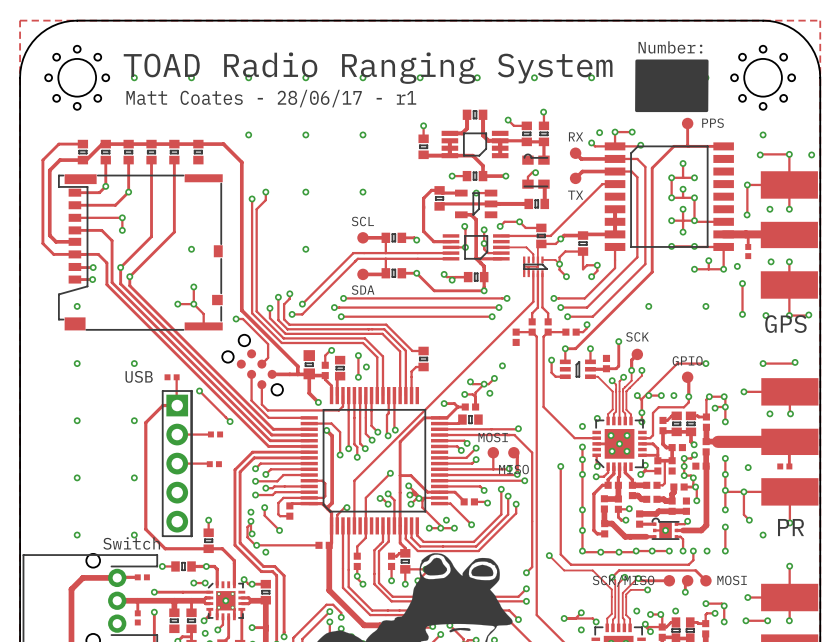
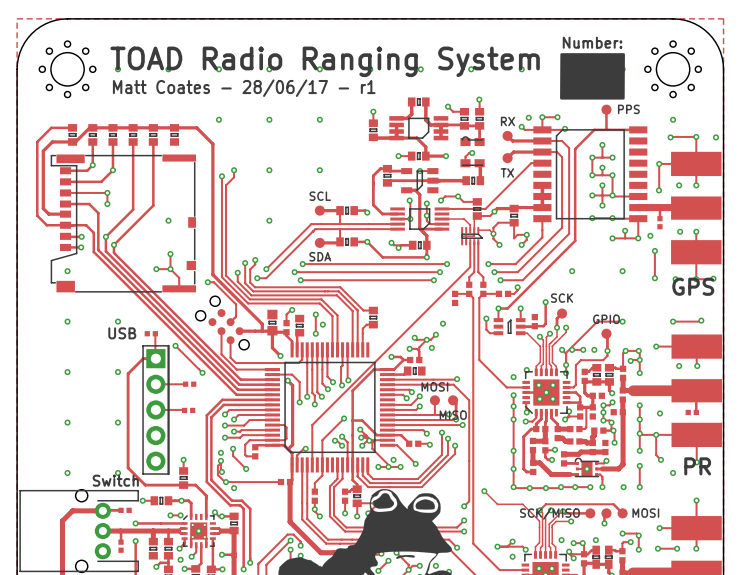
track: (560, 466) (560, 554) (571, 564) (688, 564) (693, 560) (693, 551) -> none
via: (560, 466) -> none
via: (693, 551) -> none

